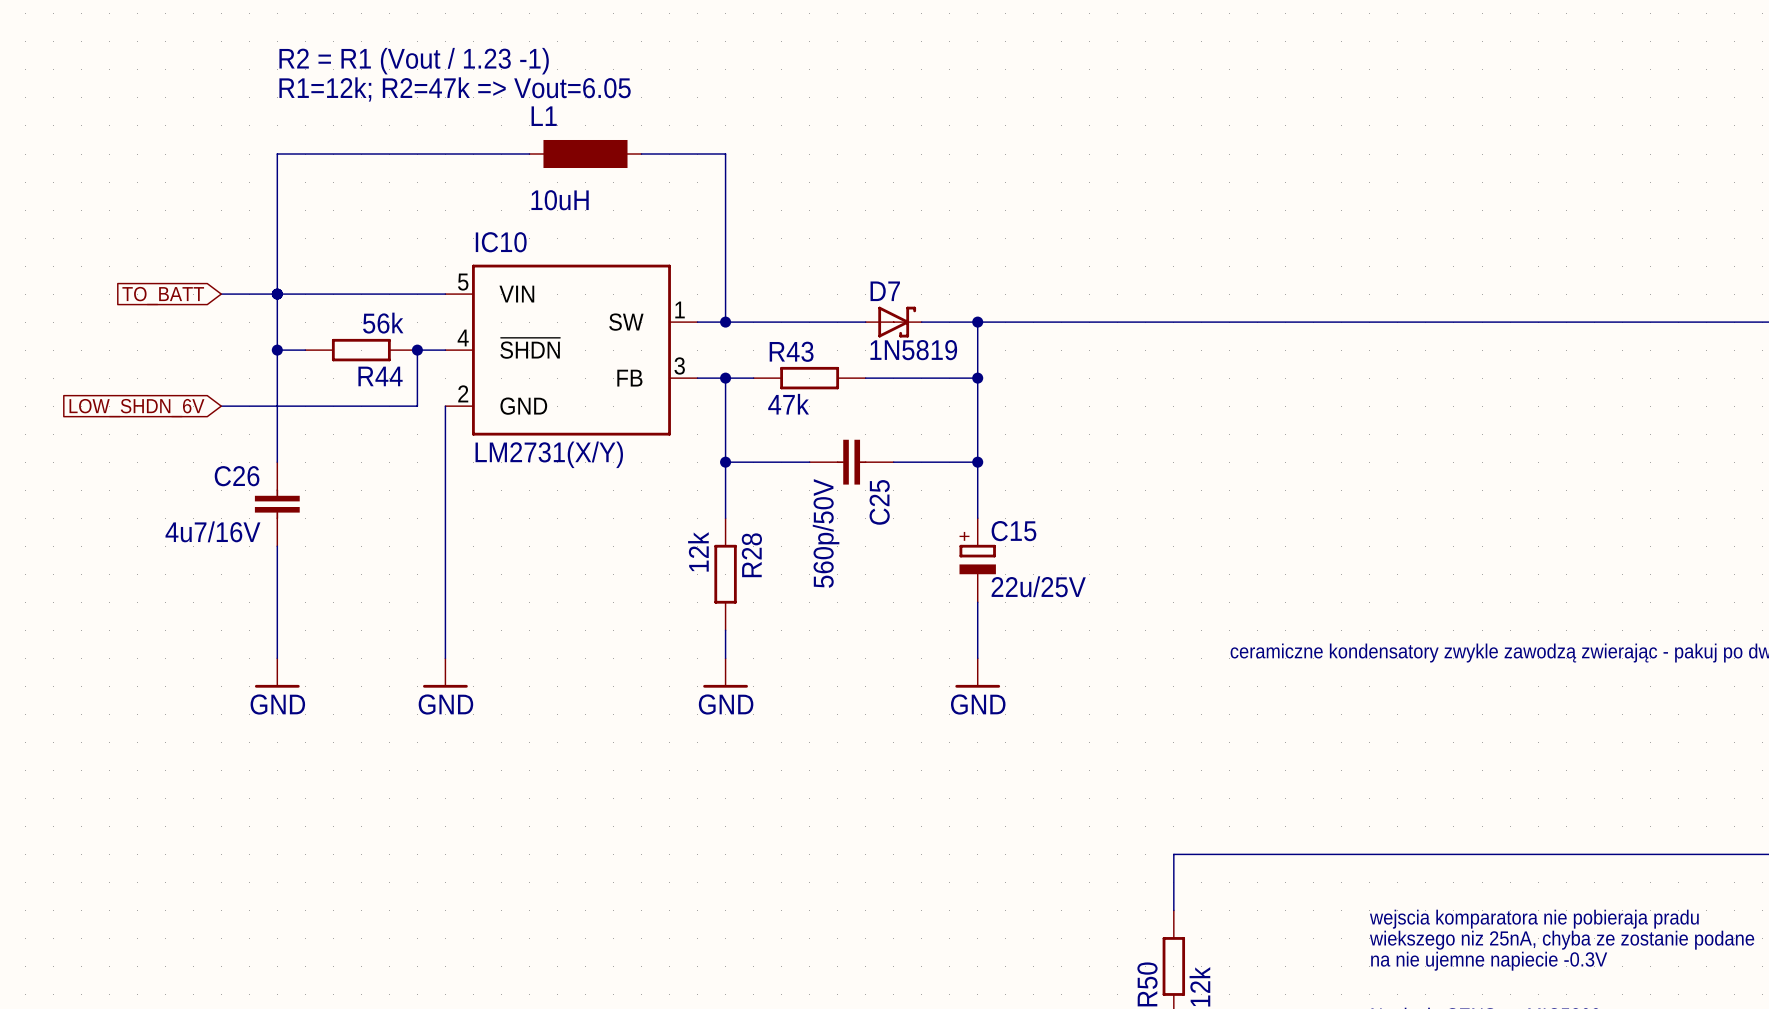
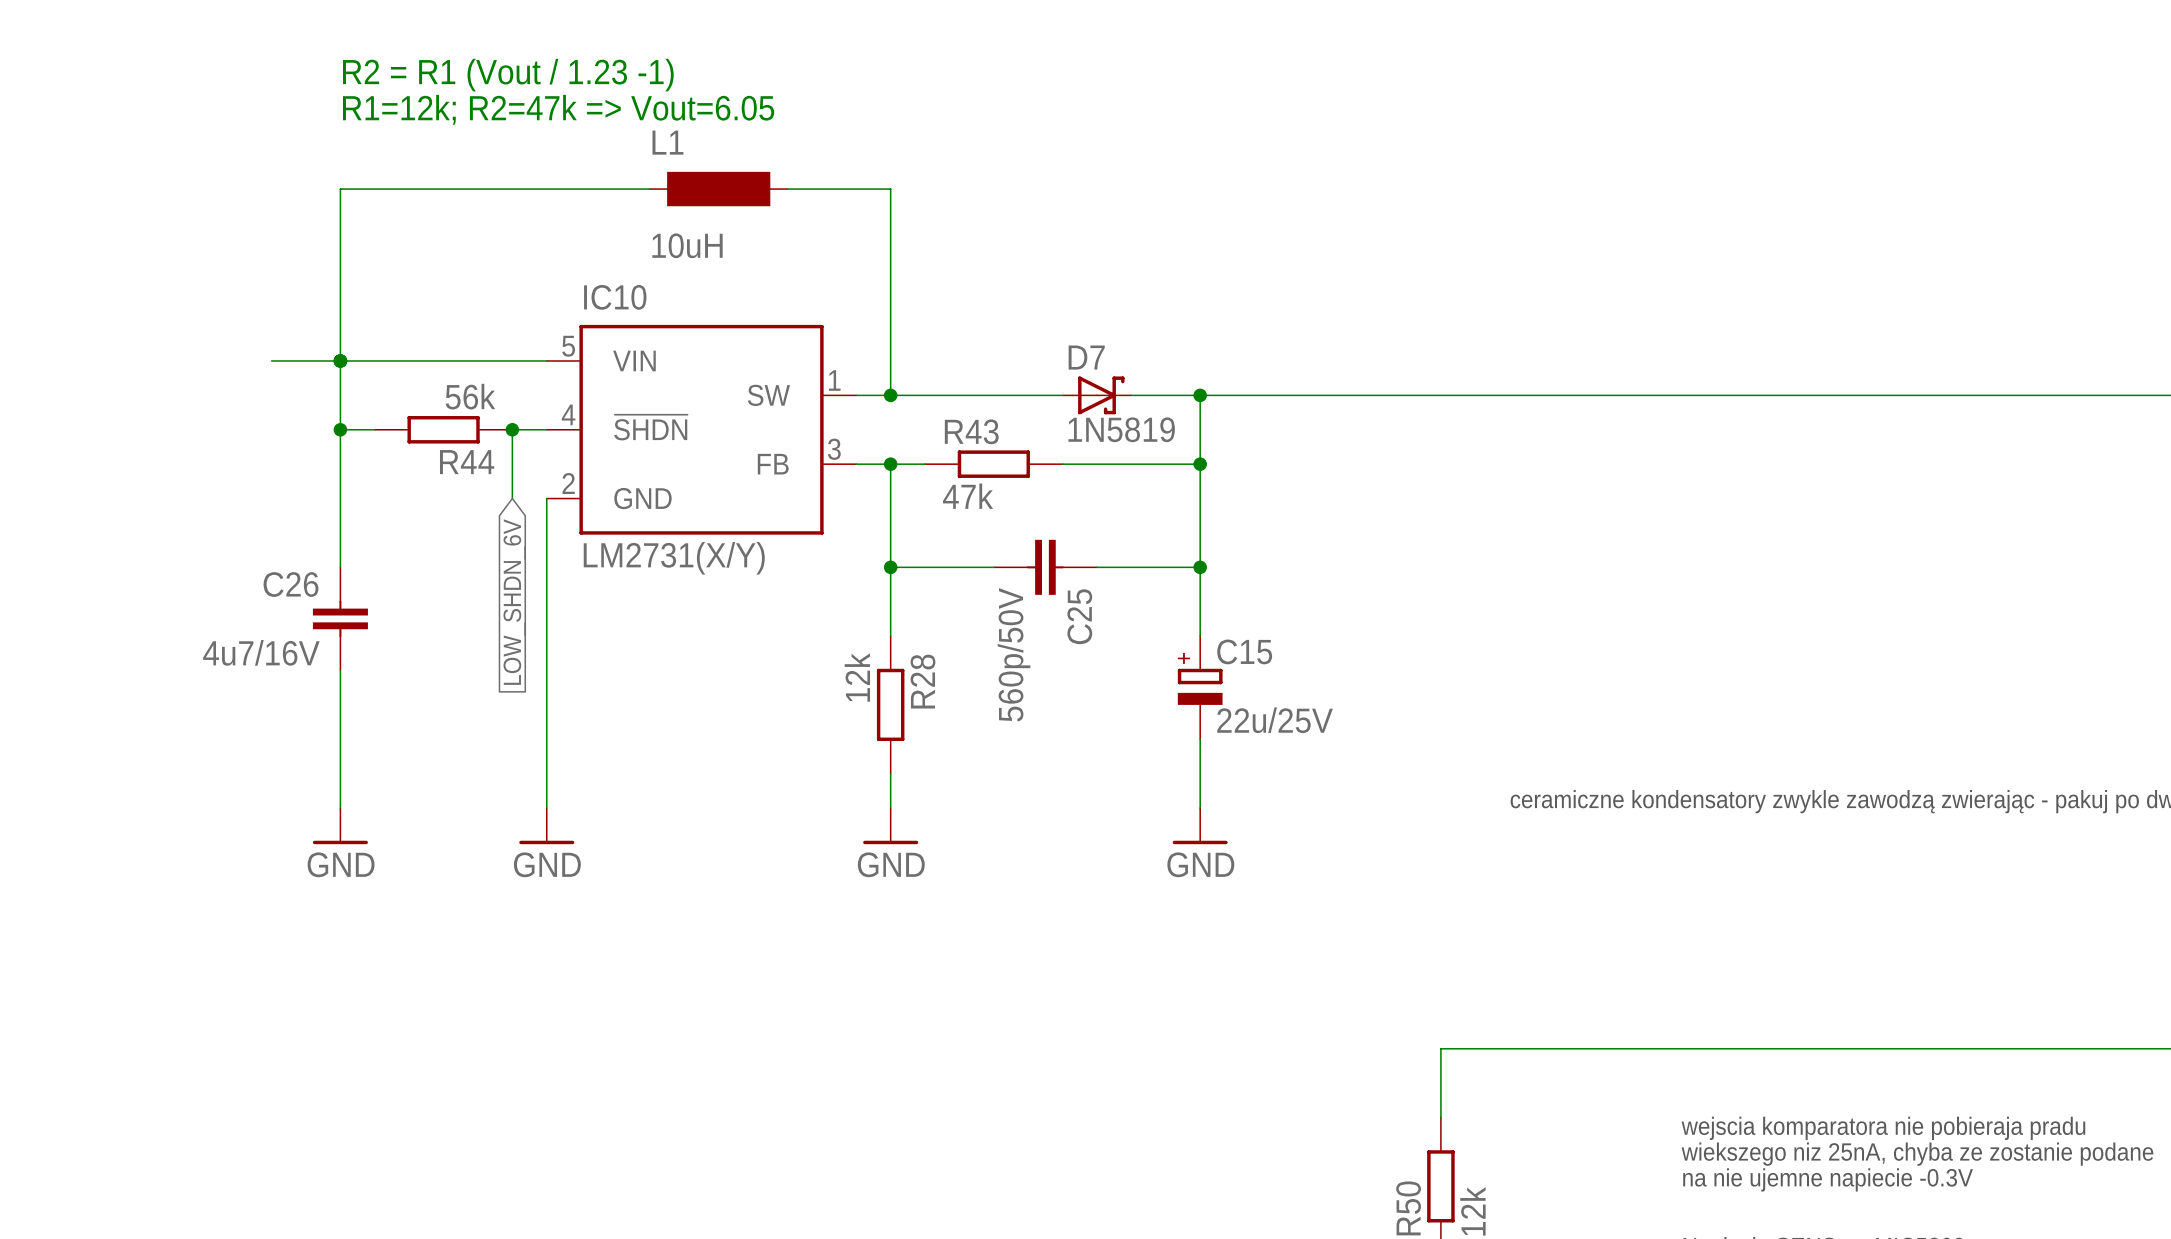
global label: TO_BATT (163, 295) -> none
wire: (221, 406) (417, 406) -> none
global label rotation: 0° (136, 408) -> 90° counterclockwise (514, 602)
global label position: LOW_SHDN_6V (136, 408) -> LOW_SHDN_6V (514, 602)

